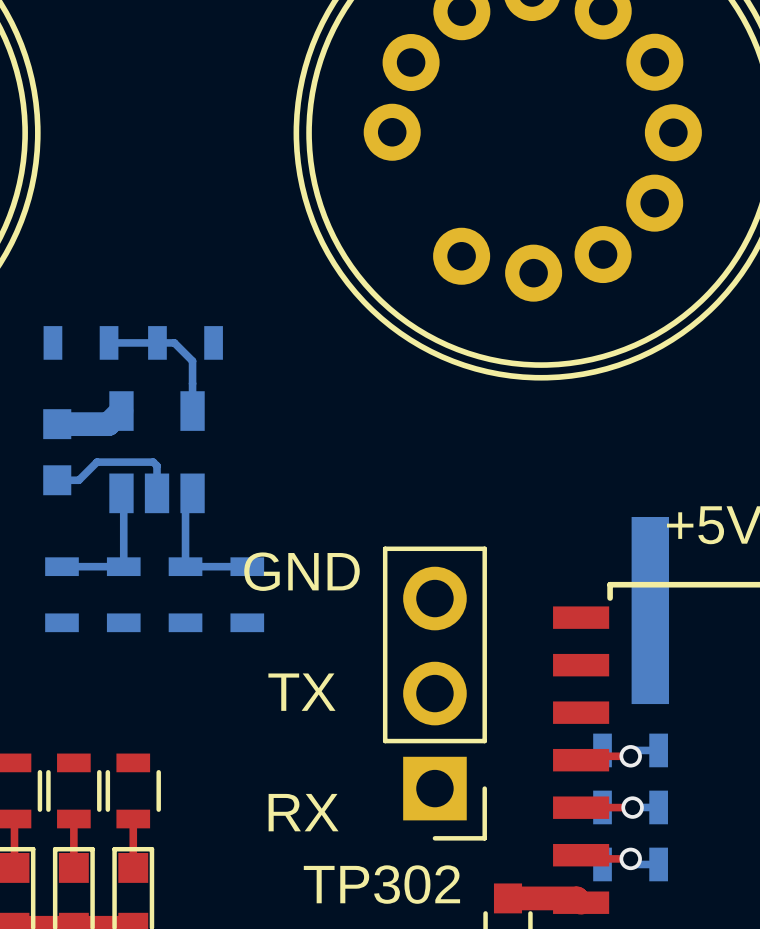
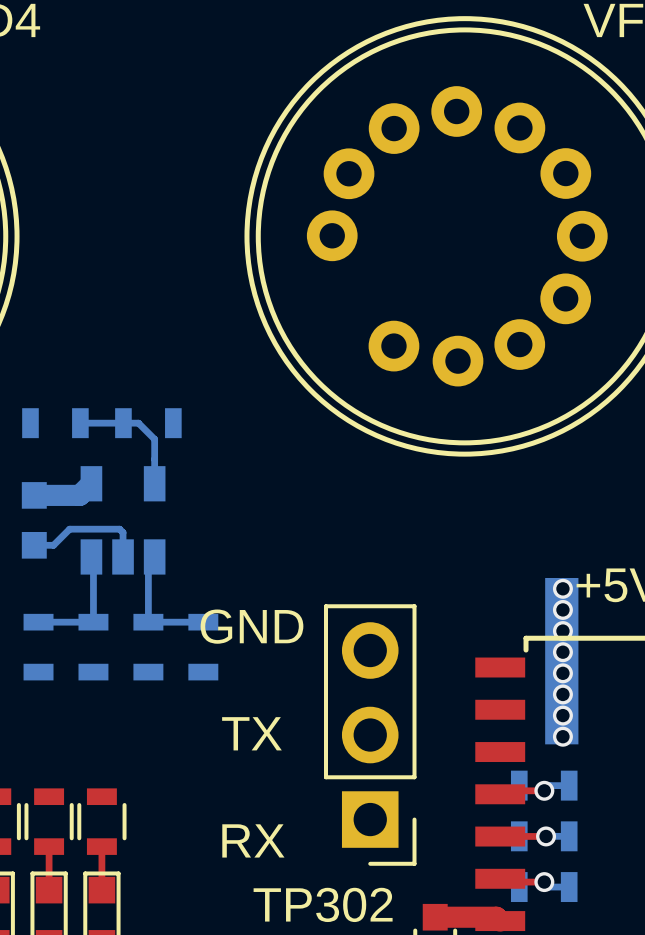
via: none -> (562, 588)
via: none -> (562, 609)
via: none -> (562, 631)
via: none -> (562, 652)
via: none -> (562, 673)
via: none -> (562, 694)
via: none -> (562, 715)
via: none -> (562, 736)

